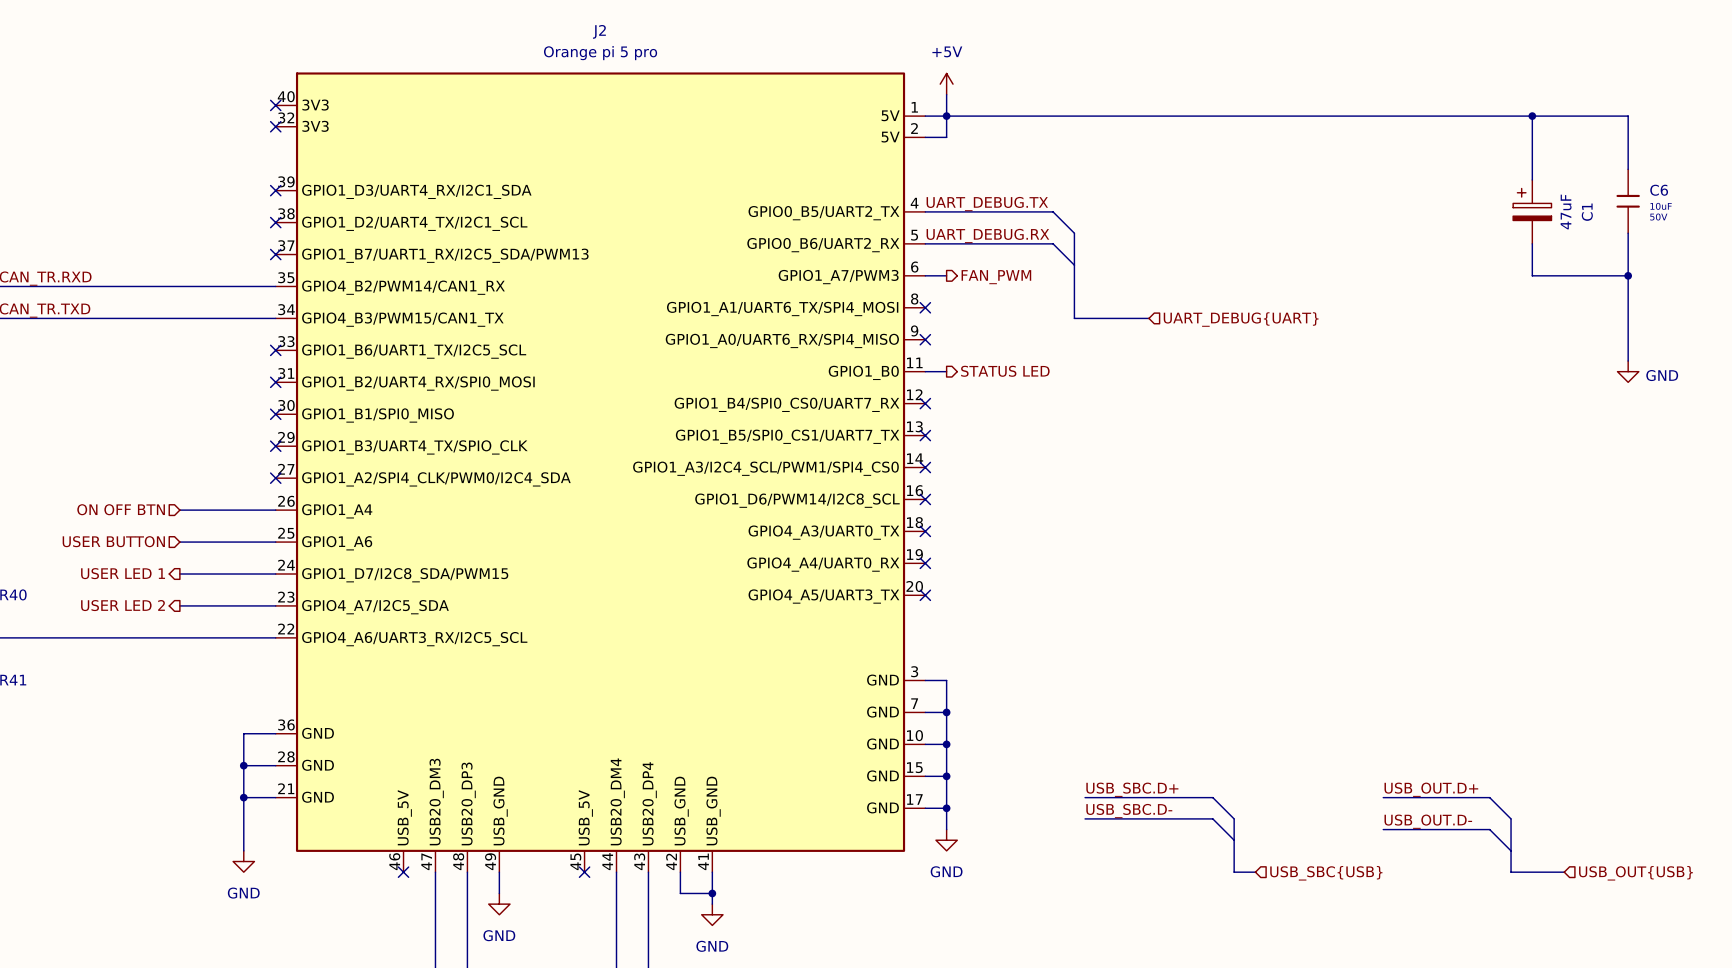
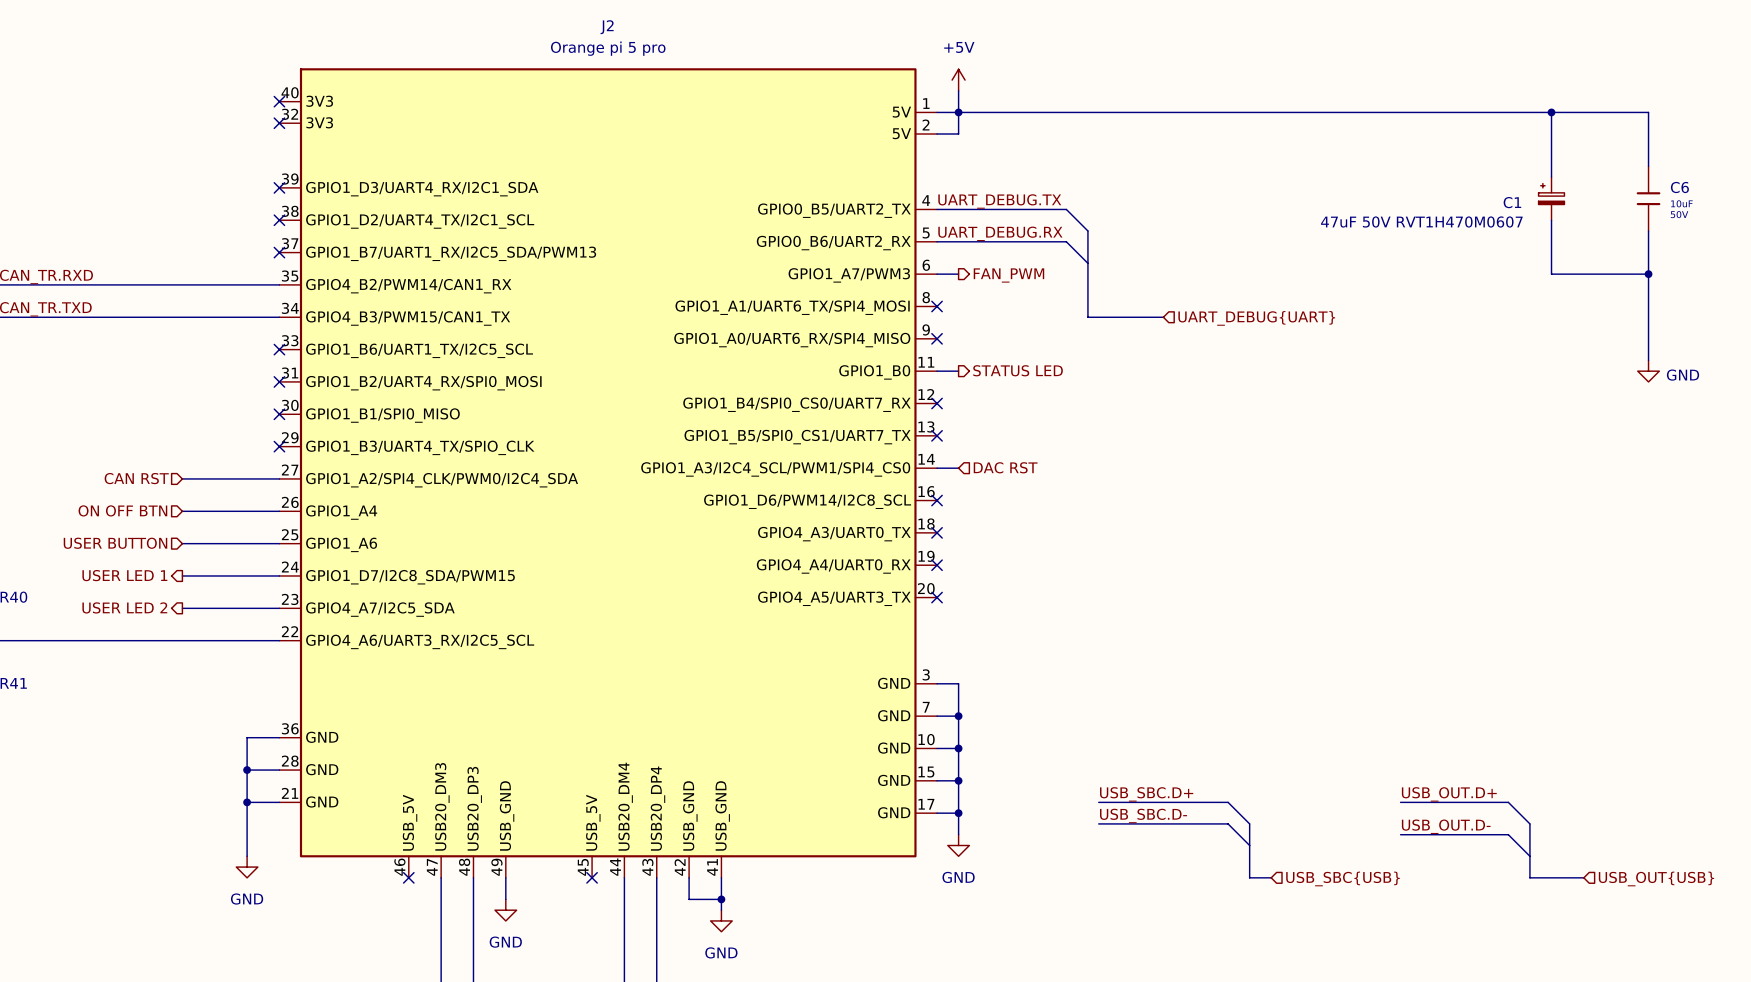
C1 symbol: [1513, 179, 1552, 244] -> [1538, 177, 1565, 221]
C1 value: 47uF (1566, 212) -> 47uF 50V RVT1H470M0607 (1421, 222)
C1 name position: C1 (1587, 212) -> C1 (1512, 202)
wire: none -> (937, 468) (958, 468)
no-connect mark: (925, 467) -> none
hierarchical label: none -> DAC RST (1005, 467)
hierarchical label: none -> CAN RST (136, 478)
wire: none -> (182, 478) (279, 478)
no-connect mark: (275, 478) -> none

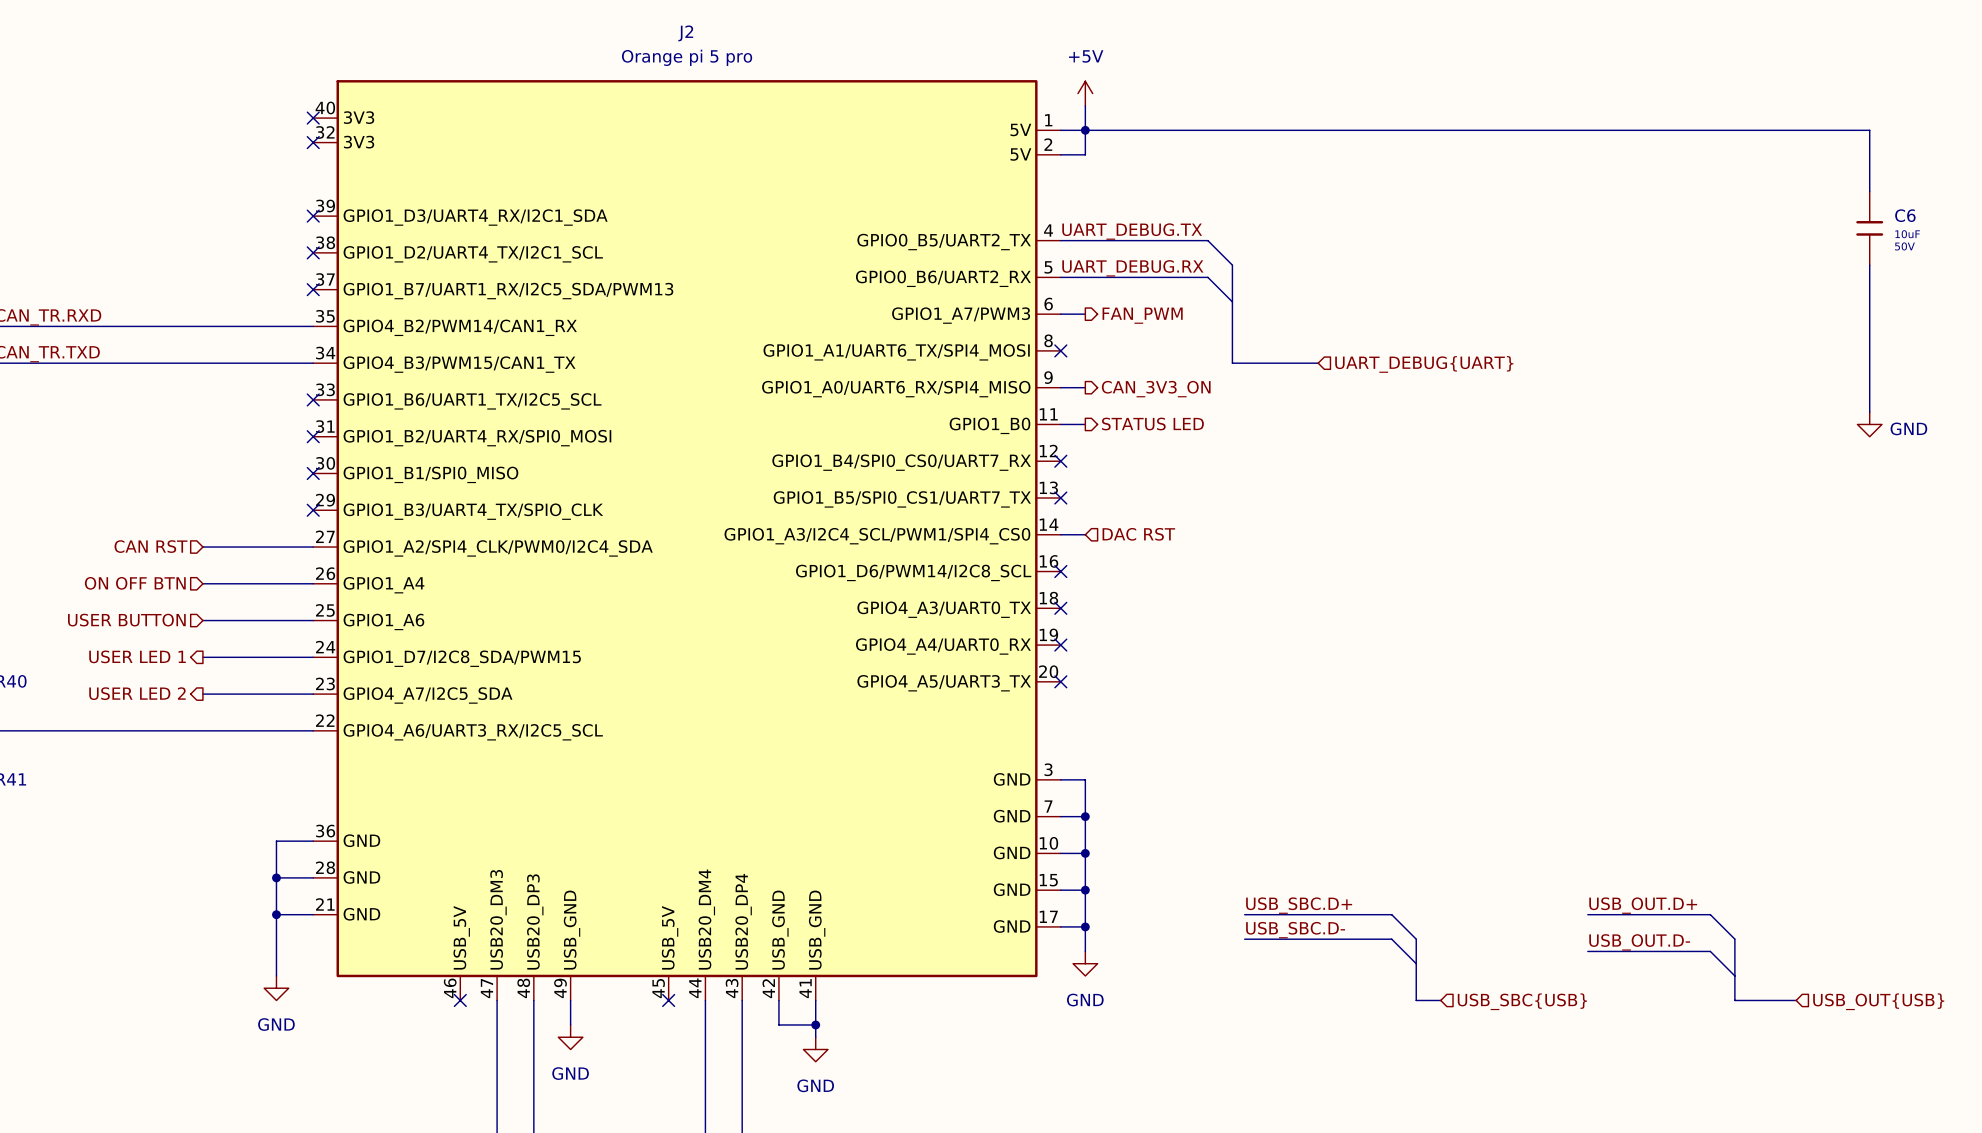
wire: (1551, 112) (1551, 177) -> none
junction: (1551, 112) -> none
C1: 47uF 50V RVT1H470M0607 (1551, 198) -> none
wire: (1551, 220) (1551, 274) (1648, 274) -> none
junction: (1648, 274) -> none
wire: none -> (1060, 387) (1085, 387)
no-connect mark: (937, 338) -> none
hierarchical label: none -> CAN_3V3_ON (1156, 389)

